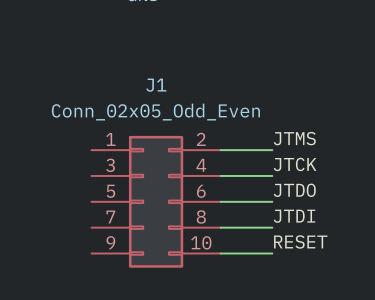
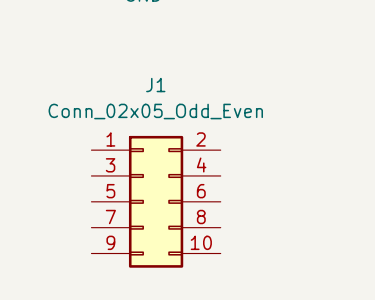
label: JTMS (294, 138) -> none
wire: (220, 150) (272, 150) -> none
label: JTCK (295, 164) -> none
wire: (220, 175) (272, 175) -> none
label: JTDO (294, 190) -> none
wire: (220, 201) (272, 201) -> none
label: JTDI (294, 216) -> none
wire: (220, 227) (272, 227) -> none
label: RESET (300, 241) -> none
wire: (220, 253) (272, 253) -> none

